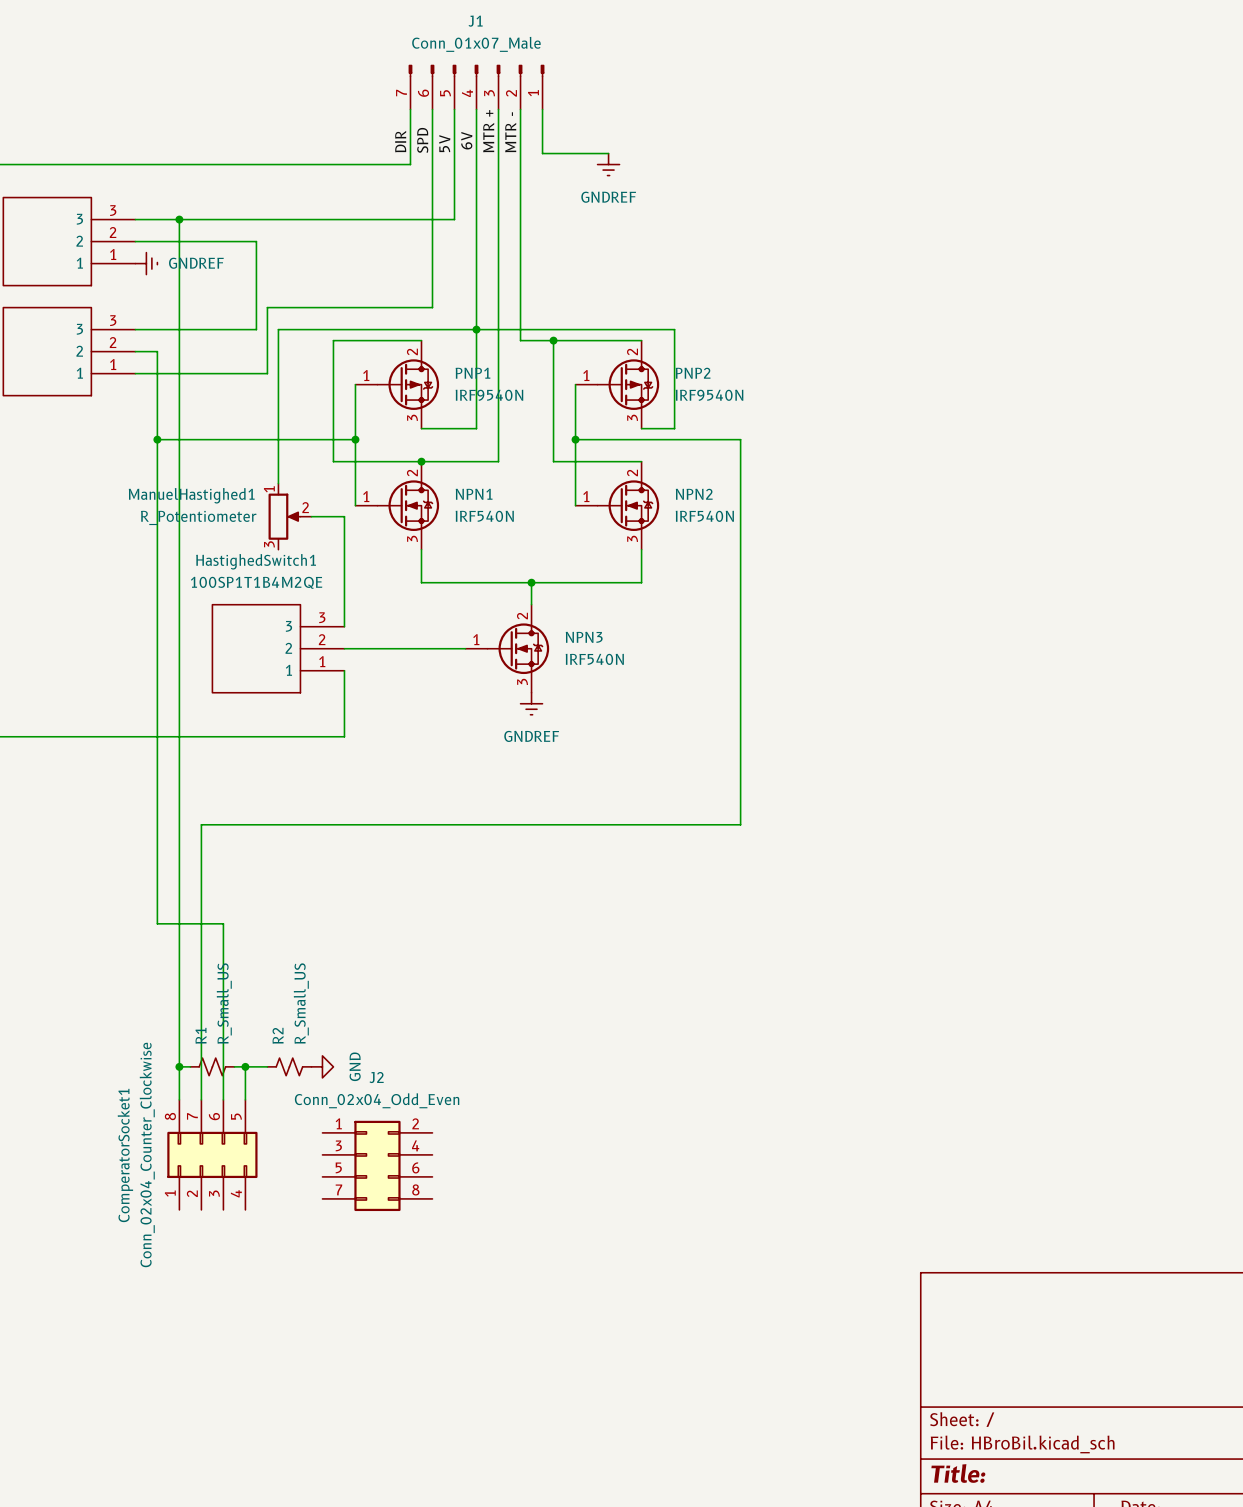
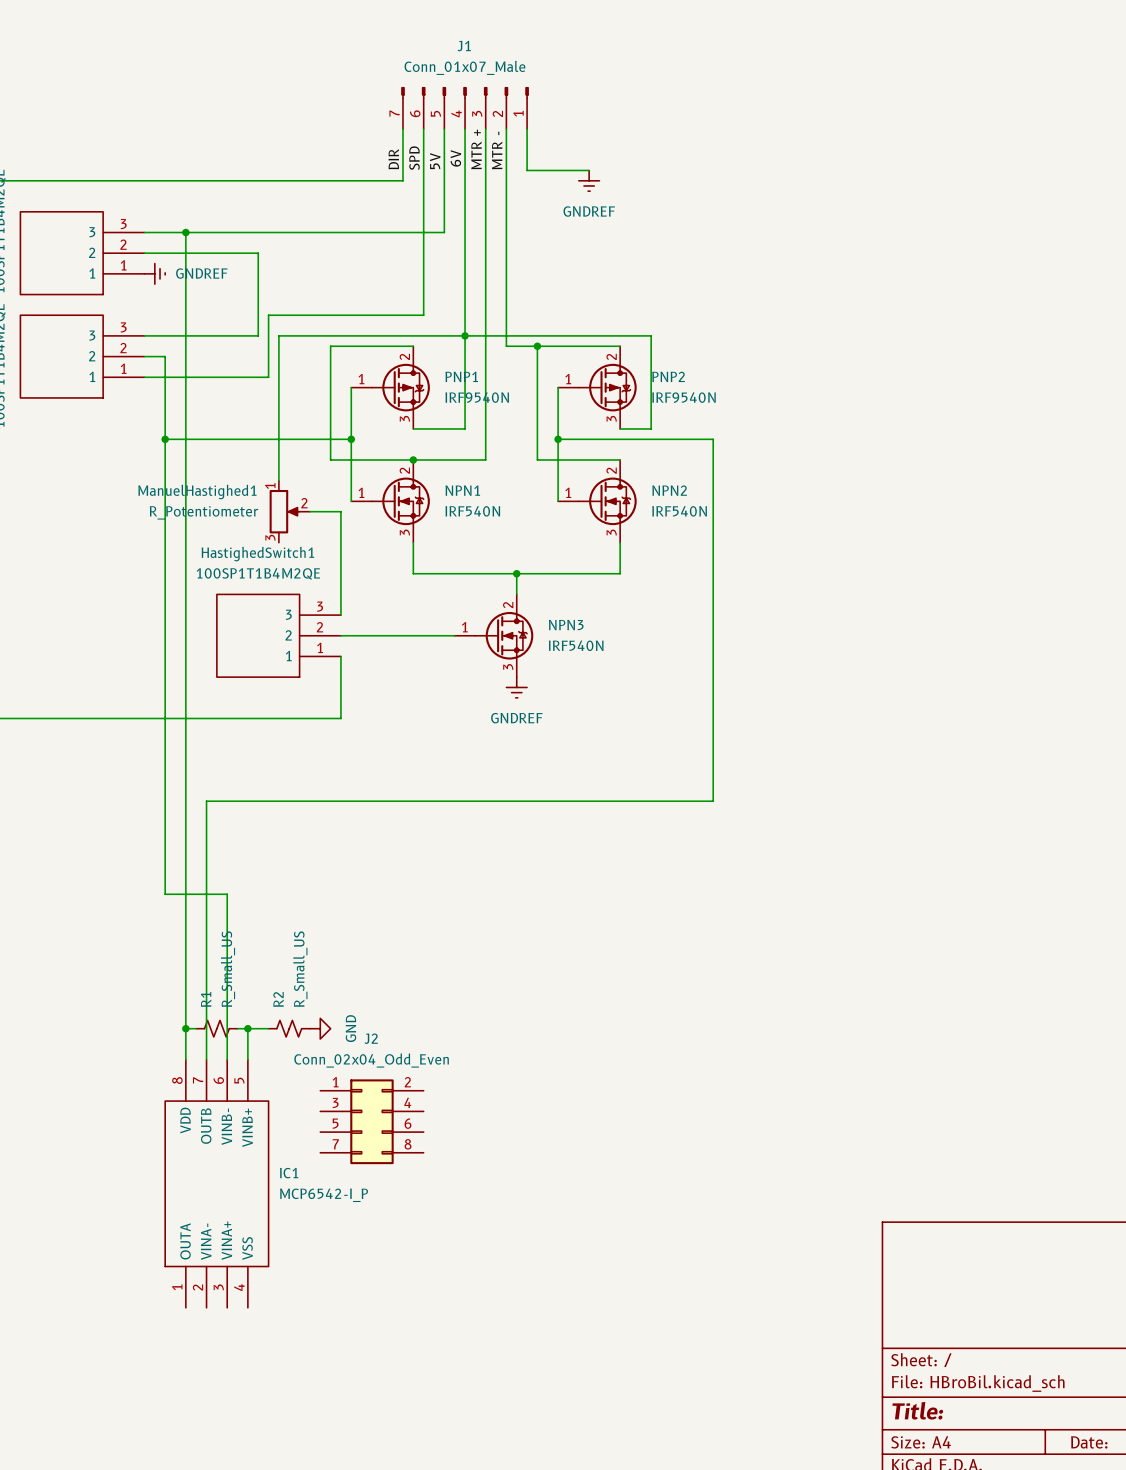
ComperatorSocket1: Conn_02x04_Counter_Clockwise (212, 1154) -> none
IC1: none -> MCP6542-I_P (216, 1183)

